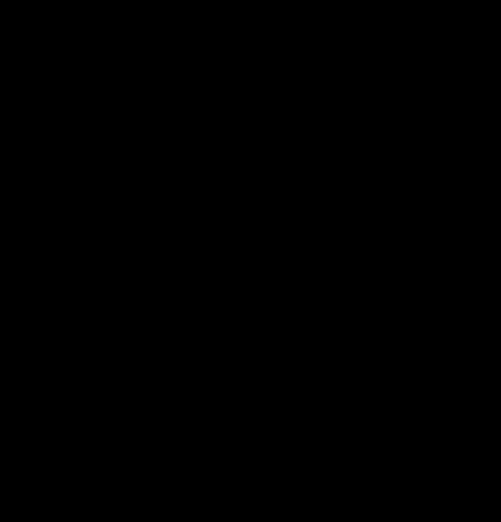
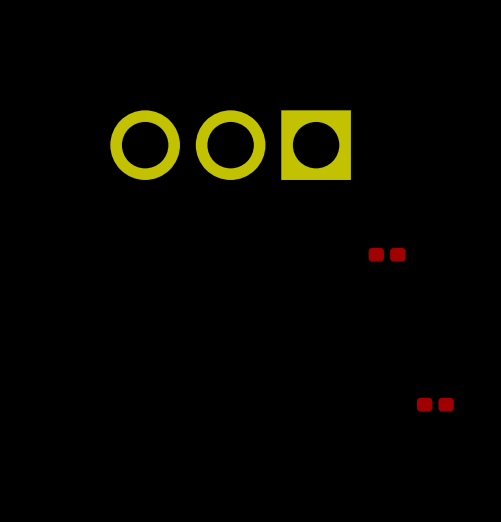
part: none -> (230, 145)
part: none -> (387, 254)
part: none -> (435, 404)

